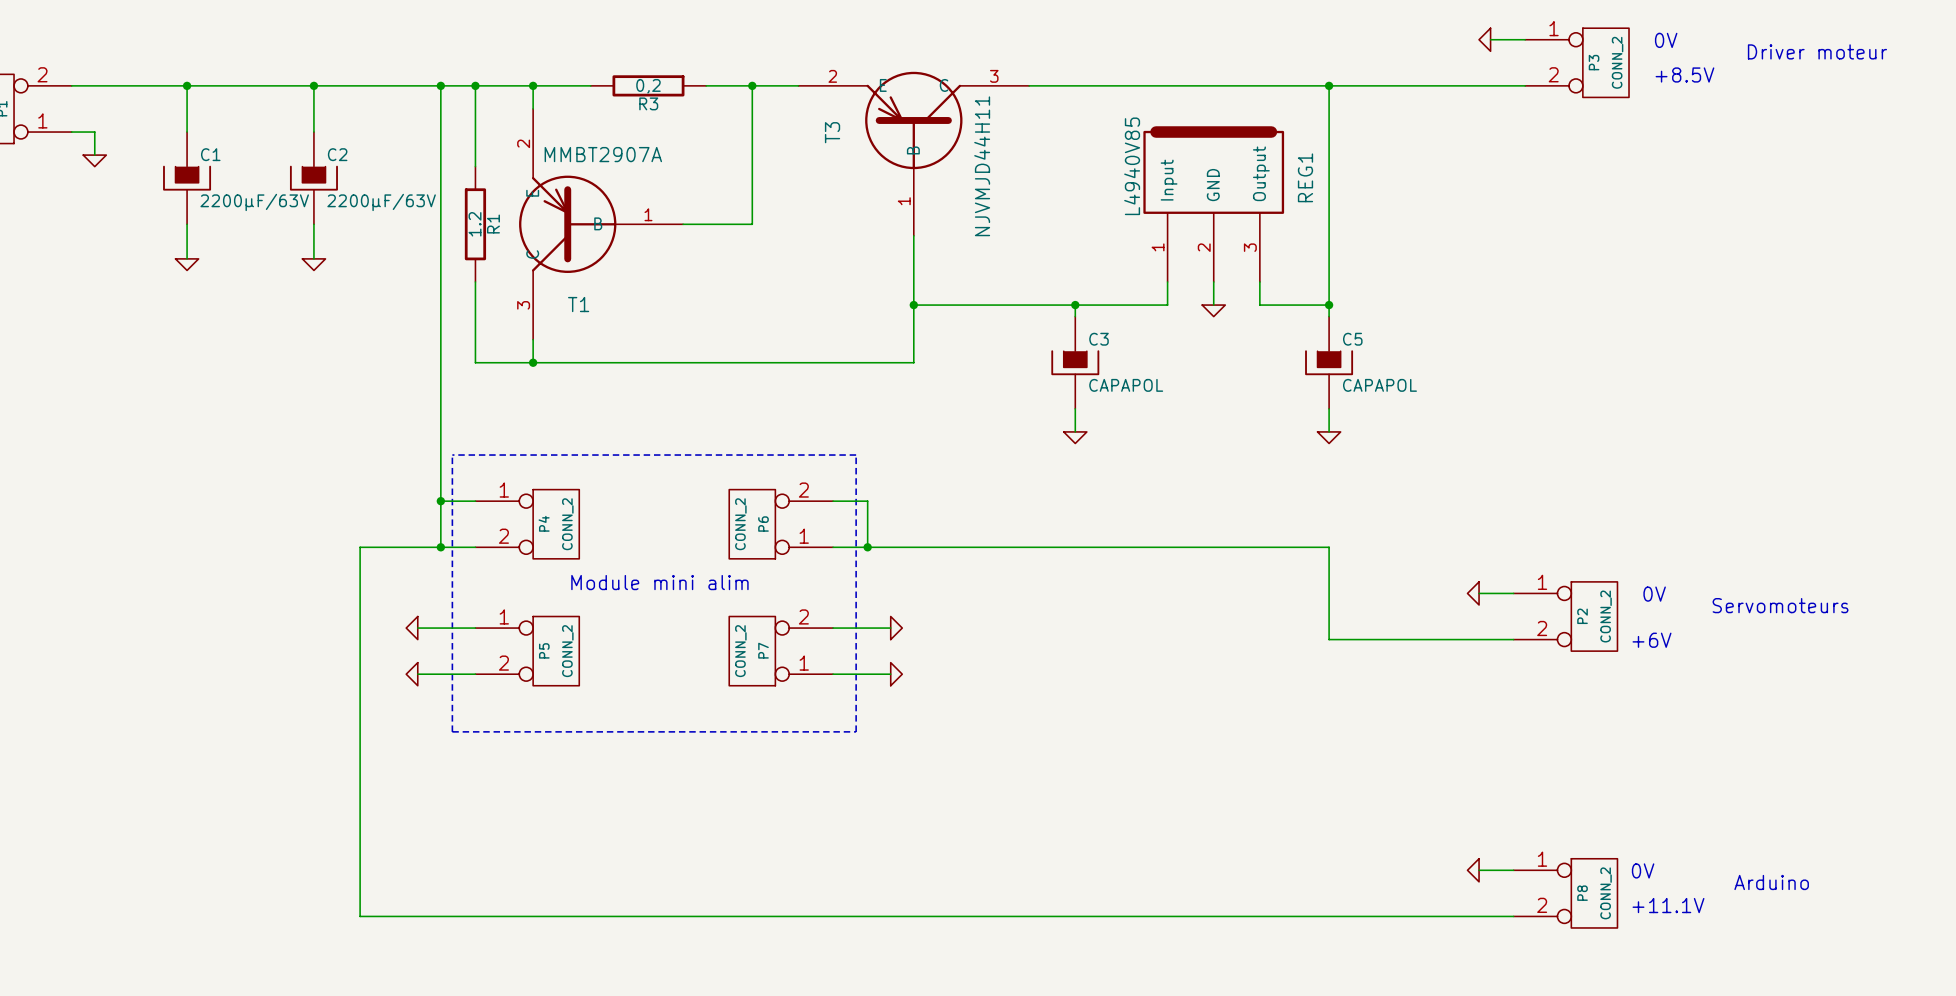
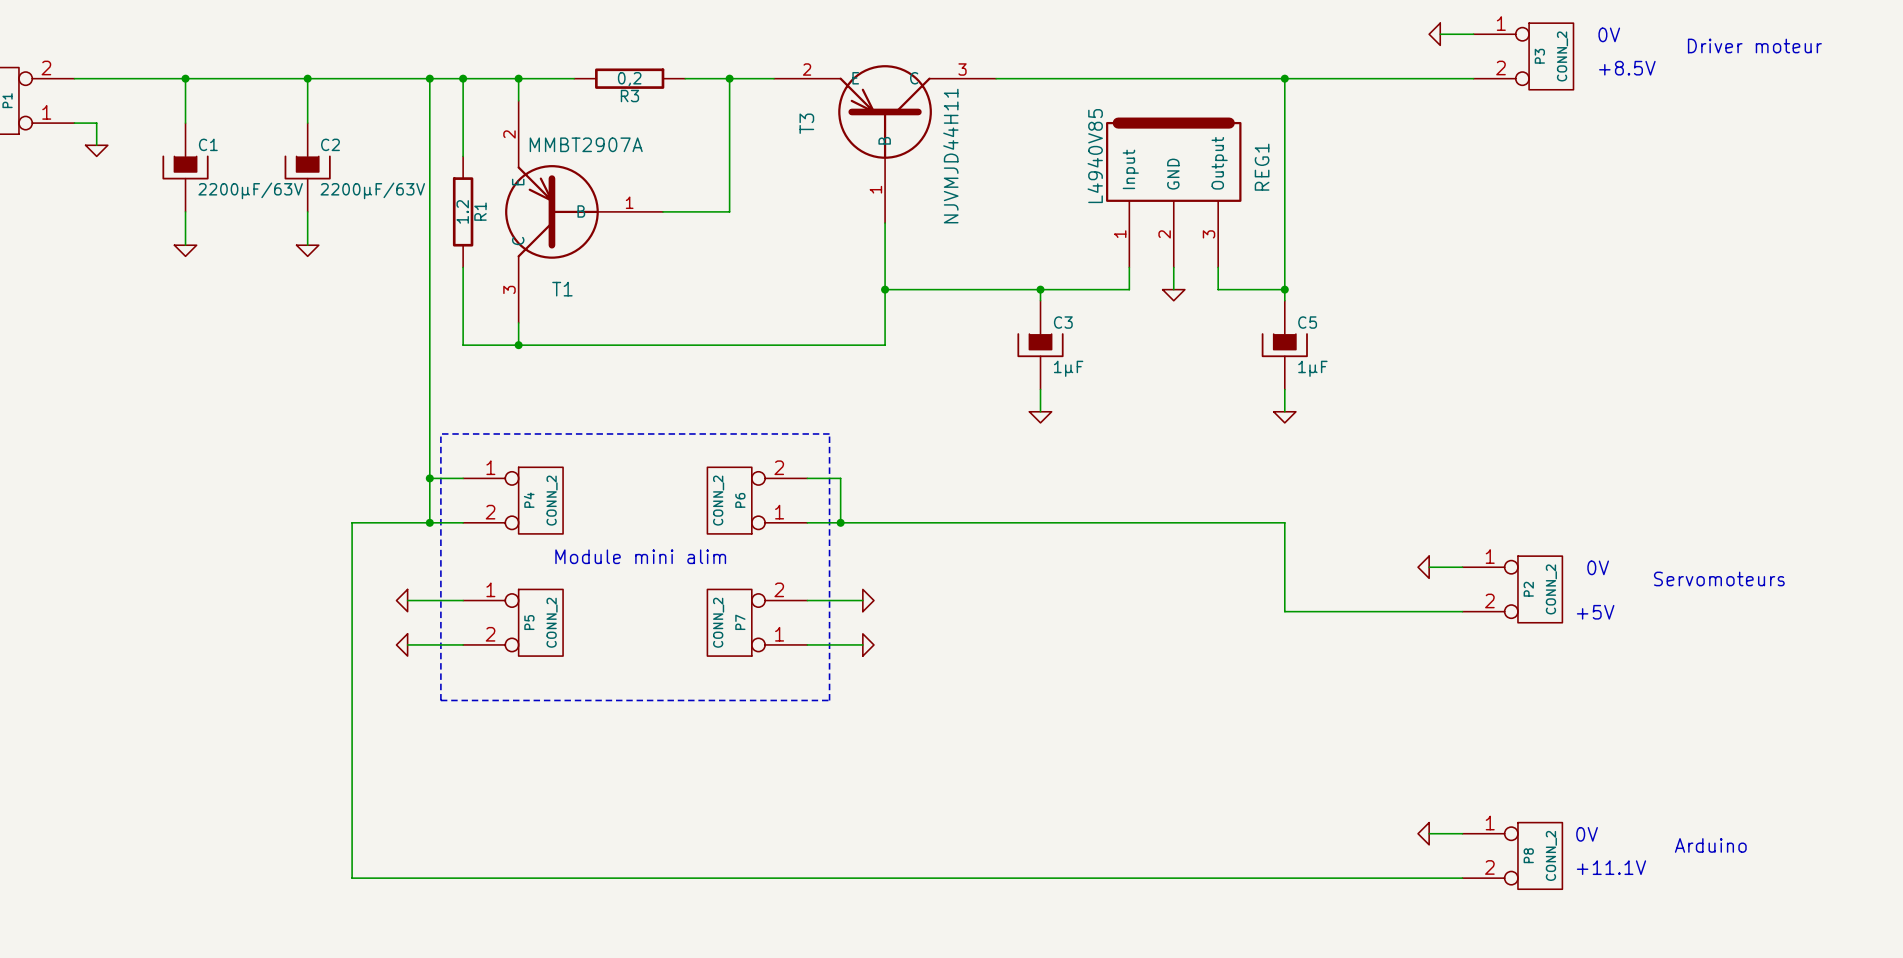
C3 value: CAPAPOL (1126, 385) -> 1µF (1068, 368)
C5 value: CAPAPOL (1379, 385) -> 1µF (1312, 368)
text: +6V (1652, 640) -> +5V (1595, 612)

